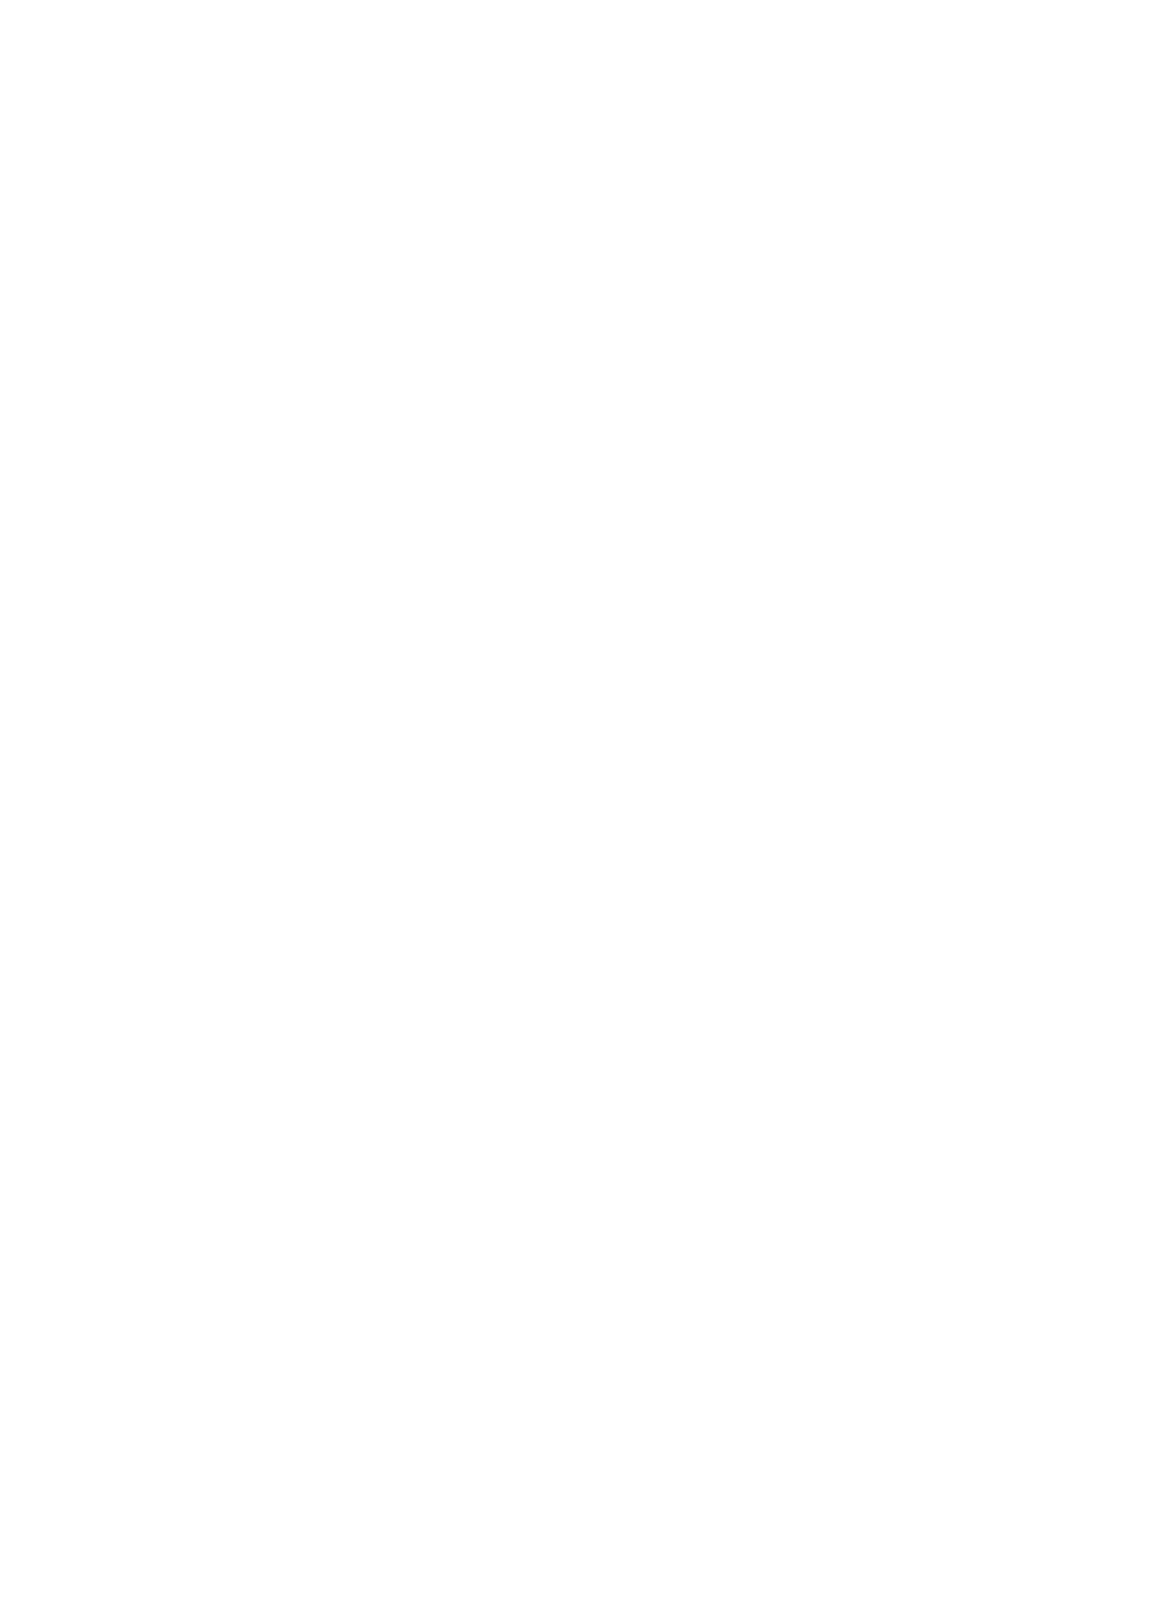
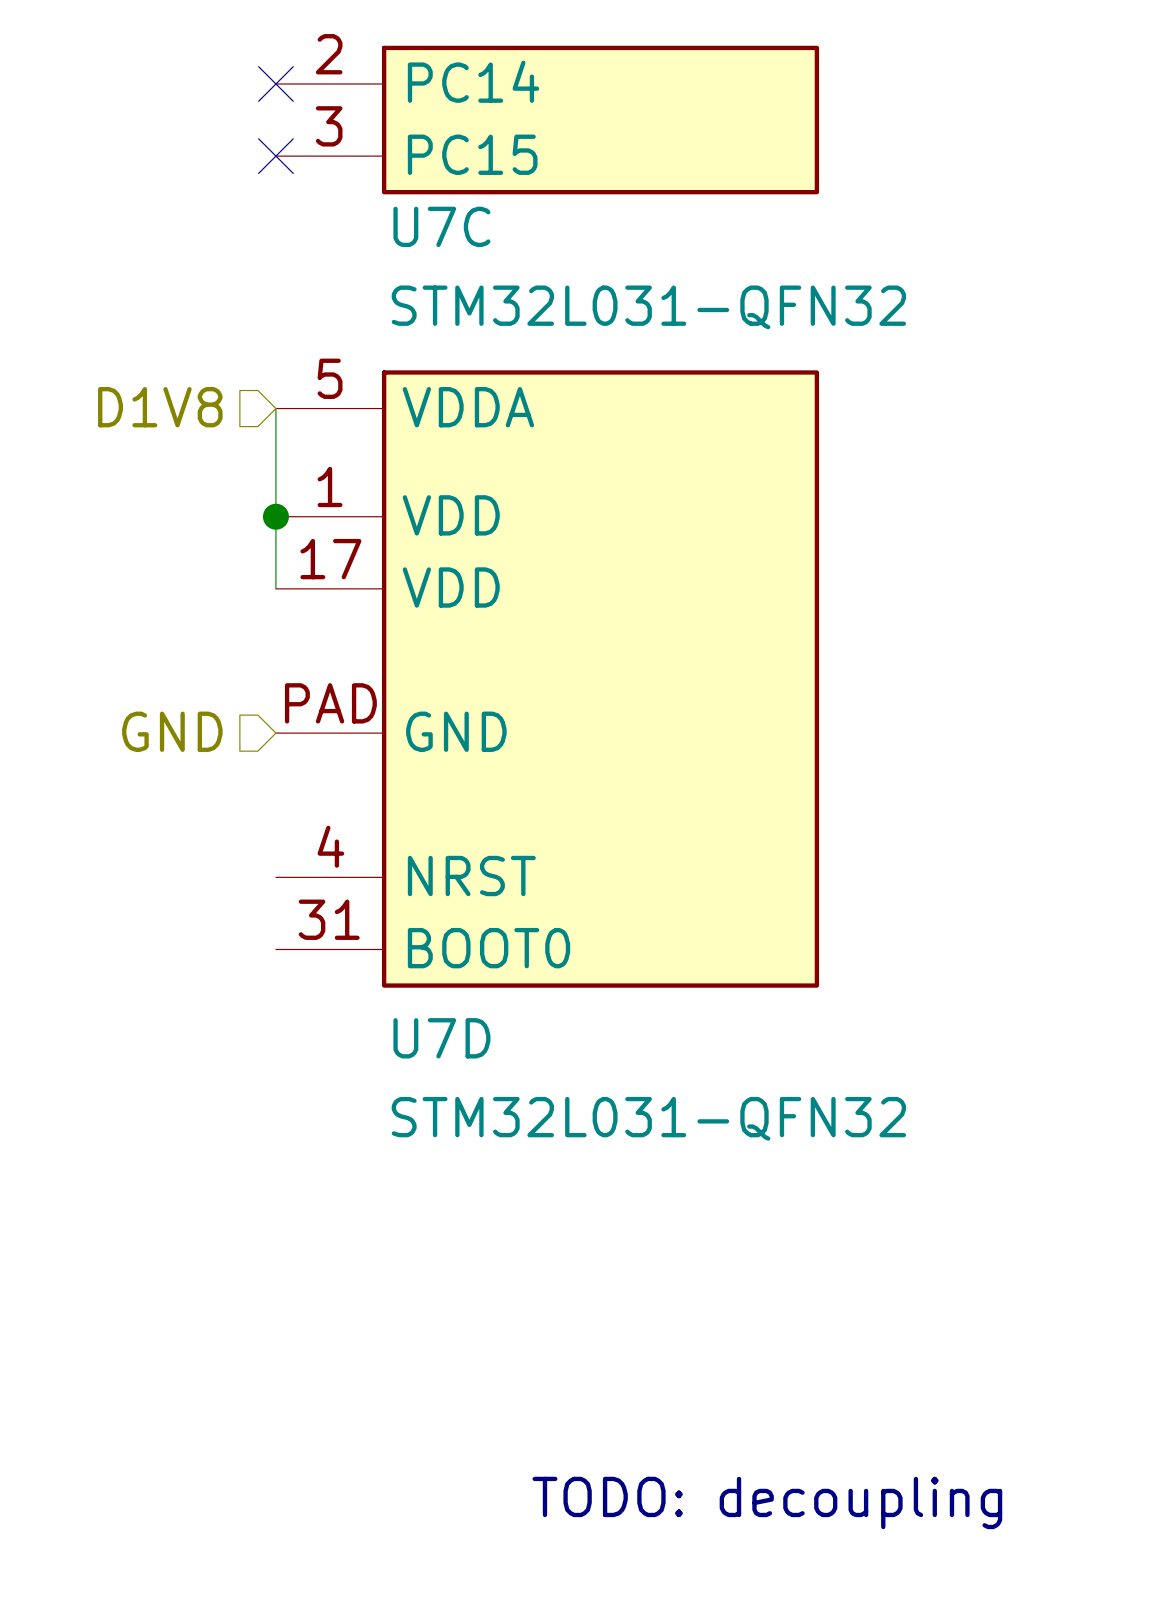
no-connect mark: none -> (275, 83)
U7C: none -> STM32L031-QFN32 (547, 120)
no-connect mark: none -> (275, 156)
hierarchical label: none -> D1V8 (160, 407)
wire: none -> (275, 408) (275, 588)
junction: none -> (275, 516)
U7D: none -> STM32L031-QFN32 (547, 679)
hierarchical label: none -> GND (172, 731)
text: none -> TODO: decoupling (767, 1502)

